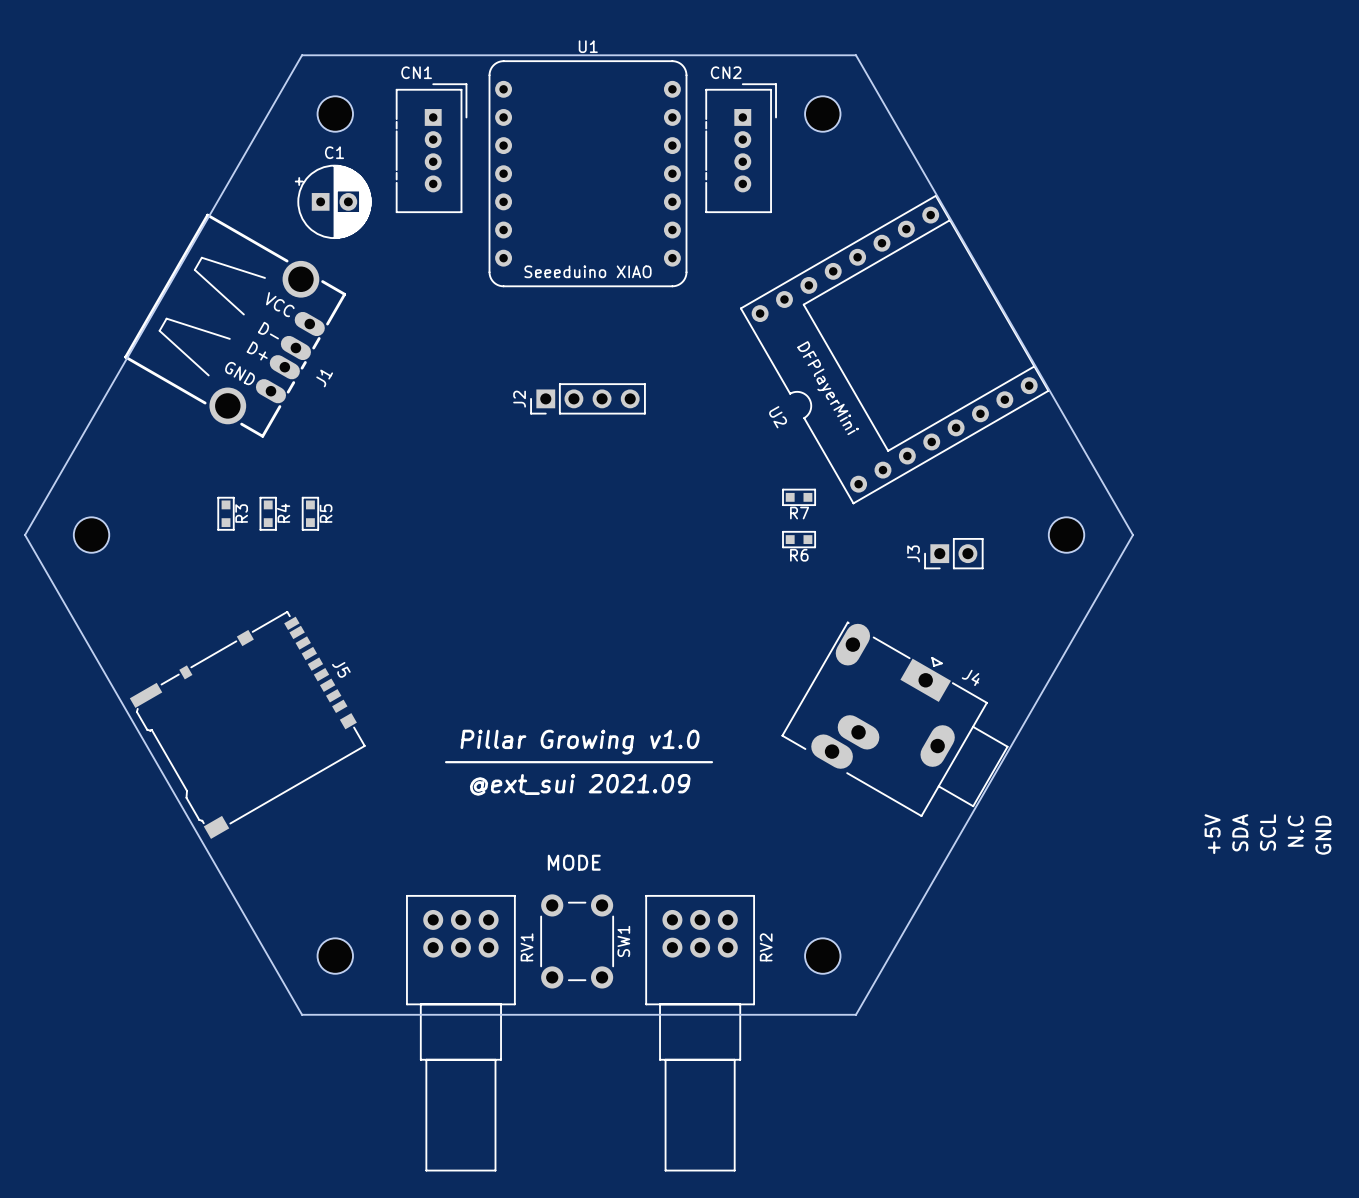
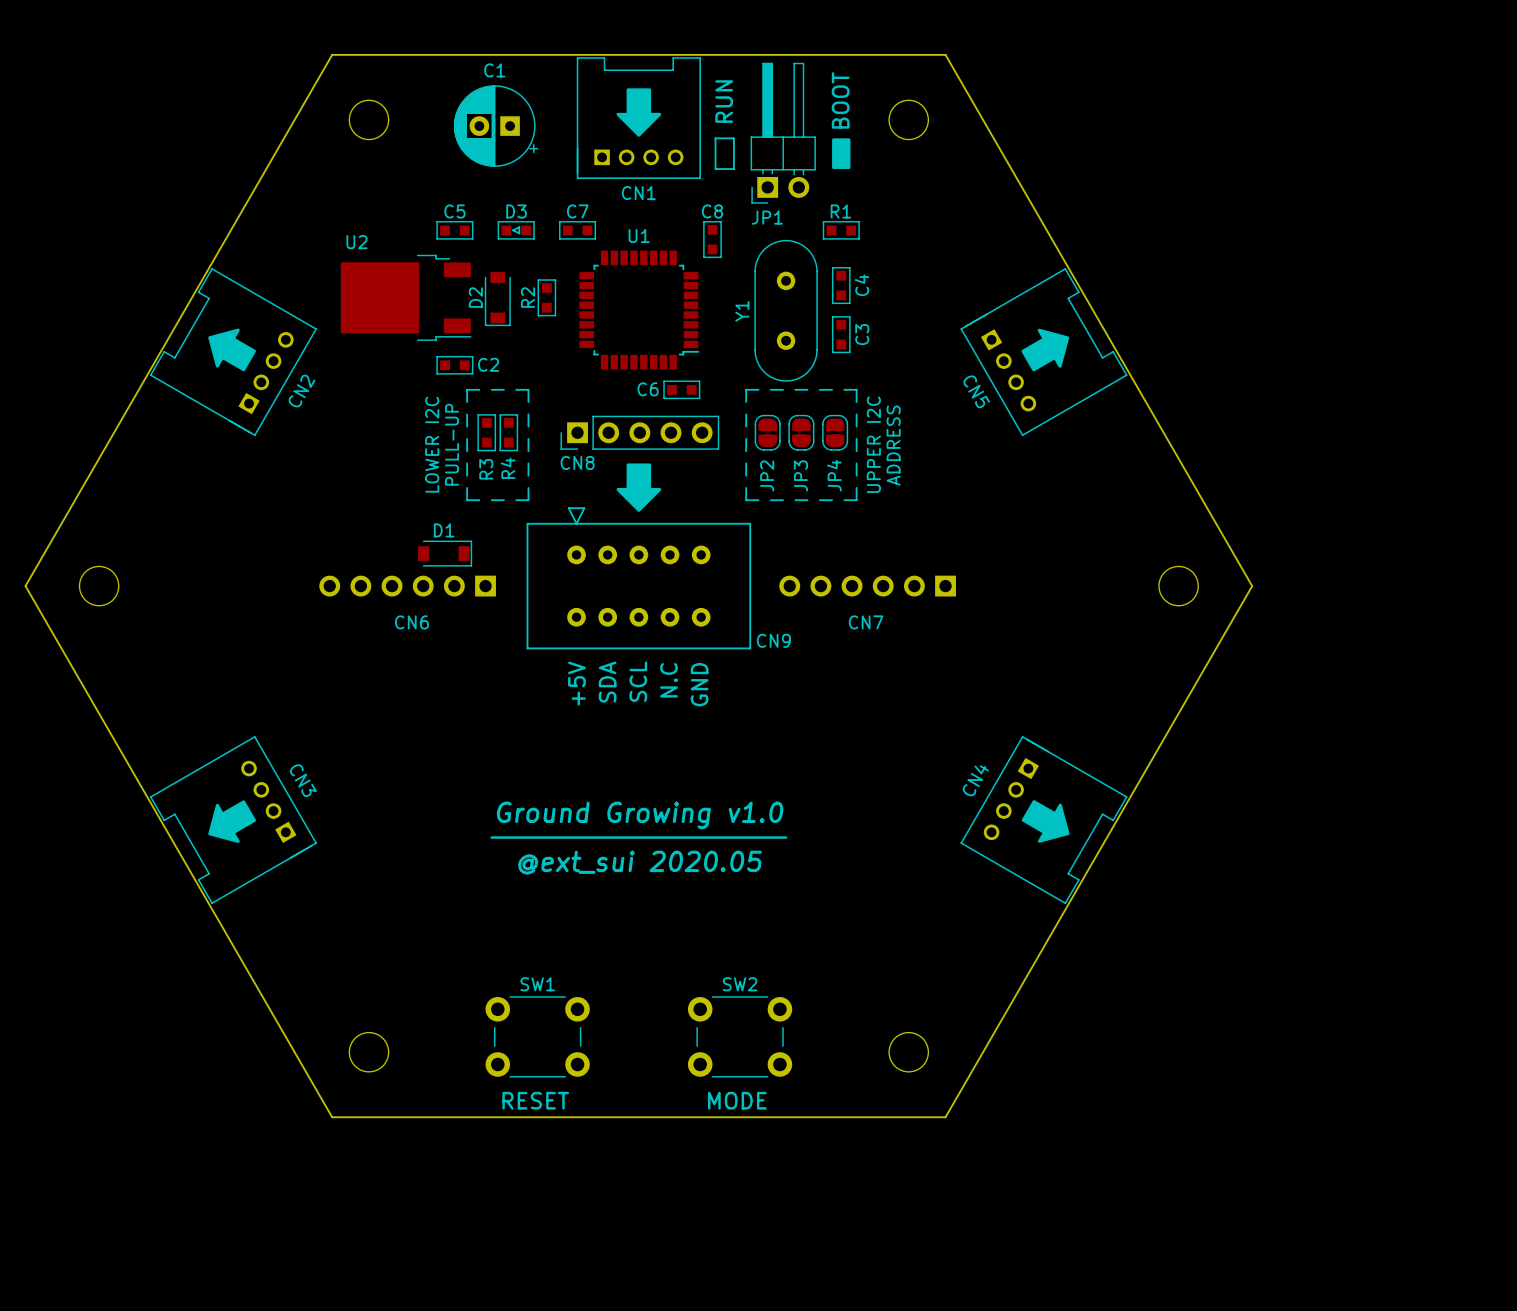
U1 name position: U1 (588, 46) -> U1 (639, 236)
U1 footprint: [488, 60, 688, 288] -> [579, 250, 700, 370]
CN1 name position: CN1 (416, 72) -> CN1 (638, 193)
CN2 name position: CN2 (726, 72) -> CN2 (301, 391)
CN1 footprint: [395, 83, 468, 213] -> [576, 57, 701, 179]
CN2 footprint: [705, 83, 777, 213] -> [149, 268, 317, 437]
drawing: none -> [616, 88, 662, 137]
text: none -> BOOT (840, 100)
text: none -> RUN (724, 101)
JP1: none -> (783, 133)
line: none -> (715, 138) (715, 169) (733, 169) (733, 138) (715, 138)
drawing: none -> [832, 138, 851, 170]
U2 footprint: [740, 195, 1050, 505] -> [340, 254, 472, 341]
C1 rotation: 0° (333, 201) -> 180° (496, 126)
C1 position: (333, 201) -> (496, 126)
C5: none -> (454, 230)
D3: none -> (516, 230)
C7: none -> (577, 230)
R1: none -> (841, 230)
C8: none -> (712, 239)
C4: none -> (841, 285)
R2: none -> (546, 297)
D2: none -> (497, 299)
Y1: none -> (786, 310)
drawing: none -> [208, 328, 256, 372]
drawing: none -> [1021, 328, 1070, 372]
C3: none -> (841, 334)
CN5: none -> (1043, 352)
J1: (235, 325) -> none
C2: none -> (454, 365)
line: none -> (479, 389) (467, 389) (467, 402)
line: none -> (491, 389) (503, 389)
line: none -> (516, 389) (528, 389) (528, 402)
C6: none -> (681, 389)
line: none -> (758, 389) (746, 389) (746, 402)
line: none -> (770, 389) (783, 389)
line: none -> (795, 389) (807, 389)
line: none -> (819, 389) (832, 389)
line: none -> (844, 389) (856, 389) (856, 402)
line: none -> (467, 414) (467, 426)
line: none -> (528, 414) (528, 426)
line: none -> (746, 414) (746, 426)
line: none -> (856, 414) (856, 426)
CN8: none -> (639, 432)
JP2: none -> (767, 432)
JP3: none -> (801, 432)
JP4: none -> (835, 432)
J2: (588, 398) -> none
line: none -> (467, 438) (467, 451)
line: none -> (528, 438) (528, 451)
line: none -> (746, 438) (746, 451)
line: none -> (856, 438) (856, 451)
text: none -> LOWER I2C (432, 444)
text: none -> PULL-UP (452, 444)
text: none -> UPPER I2C (873, 444)
text: none -> ADDRESS (893, 445)
U2 name position: U2 (778, 417) -> U2 (357, 242)
line: none -> (467, 463) (467, 475)
line: none -> (528, 463) (528, 475)
drawing: none -> [616, 463, 662, 512]
line: none -> (746, 463) (746, 475)
line: none -> (856, 463) (856, 475)
line: none -> (467, 487) (467, 500) (479, 500)
line: none -> (528, 487) (528, 500) (516, 500)
line: none -> (746, 487) (746, 500) (758, 500)
line: none -> (856, 487) (856, 500) (844, 500)
line: none -> (491, 500) (503, 500)
line: none -> (770, 500) (783, 500)
line: none -> (795, 500) (807, 500)
line: none -> (819, 500) (832, 500)
R7: (799, 497) -> none
D1: none -> (445, 553)
R3 position: (226, 513) -> (486, 432)
R3 name position: R3 (241, 513) -> R3 (486, 469)
R4 position: (268, 513) -> (508, 432)
R4 name position: R4 (283, 513) -> R4 (508, 468)
R5: (310, 513) -> none
CN9: none -> (638, 578)
CN6: none -> (407, 586)
CN7: none -> (867, 586)
R6: (799, 539) -> none
J3: (953, 553) -> none
text: none -> N.C (668, 680)
text: none -> SDA (607, 682)
text: none -> SCL (638, 681)
text: none -> +5V (576, 683)
text: none -> GND (699, 684)
J4: (894, 719) -> none
J5: (247, 725) -> none
drawing: none -> [208, 800, 256, 843]
drawing: none -> [1021, 800, 1070, 843]
text: Pillar Growing v1.0 (580, 742) -> Ground Growing v1.0 (640, 815)
CN3: none -> (233, 820)
CN4: none -> (1043, 820)
text: @ext_sui 2021.09 (580, 784) -> @ext_sui 2020.05 (639, 862)
text: N.C (1295, 831) -> none
text: SDA (1240, 832) -> none
text: SCL (1267, 832) -> none
text: +5V (1212, 834) -> none
text: GND (1323, 835) -> none
text position: MODE (574, 862) -> MODE (737, 1100)
SW1 rotation: 0° (577, 941) -> 90° clockwise (537, 1036)
SW1 position: (577, 941) -> (537, 1036)
SW1 name position: SW1 (623, 941) -> SW1 (537, 984)
SW2: none -> (740, 1036)
text: none -> RESET (535, 1100)
RV1: (460, 1033) -> none
RV2: (700, 1033) -> none

